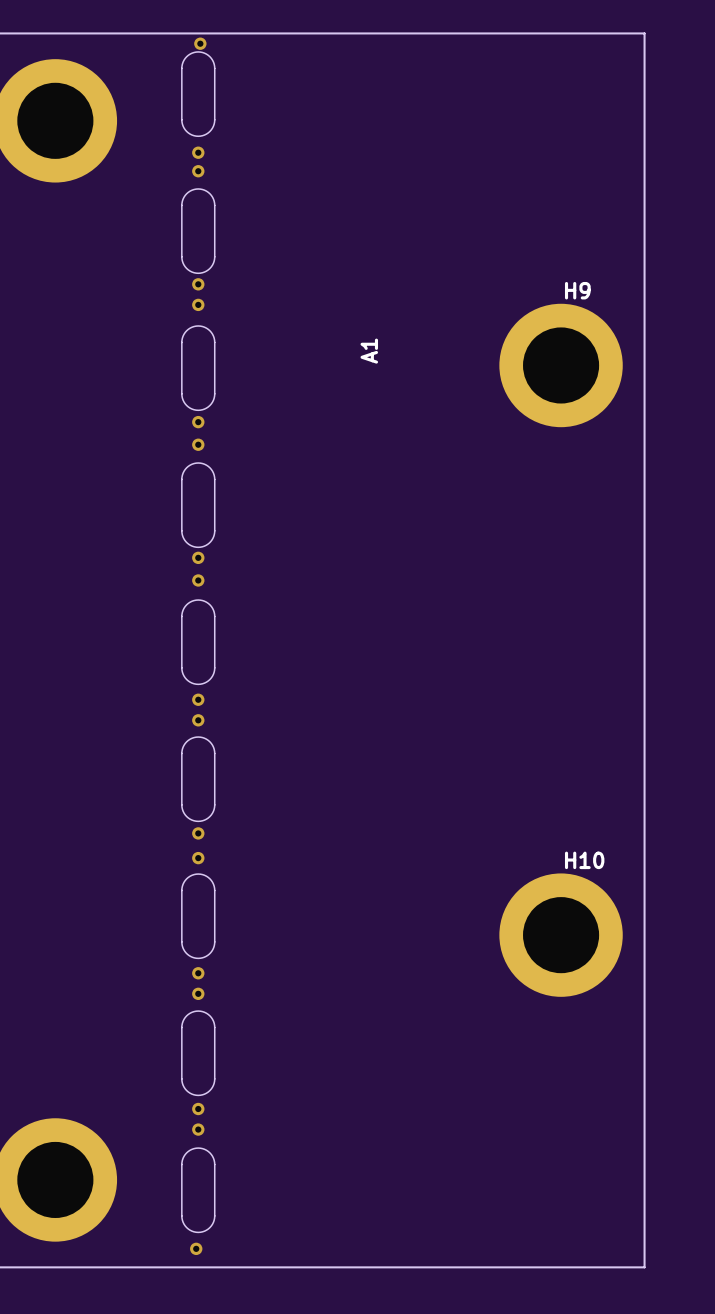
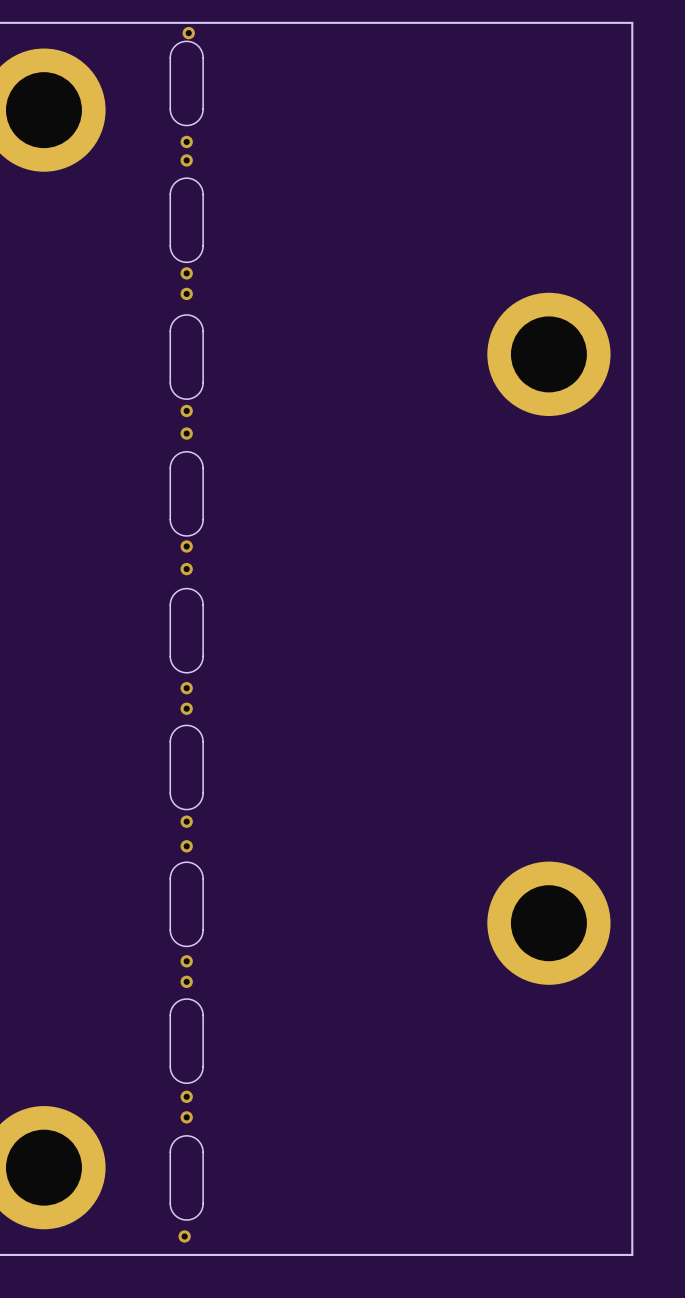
H9 name: H9 (577, 290) -> none
A1: (369, 351) -> none
H10 name: H10 (584, 860) -> none

